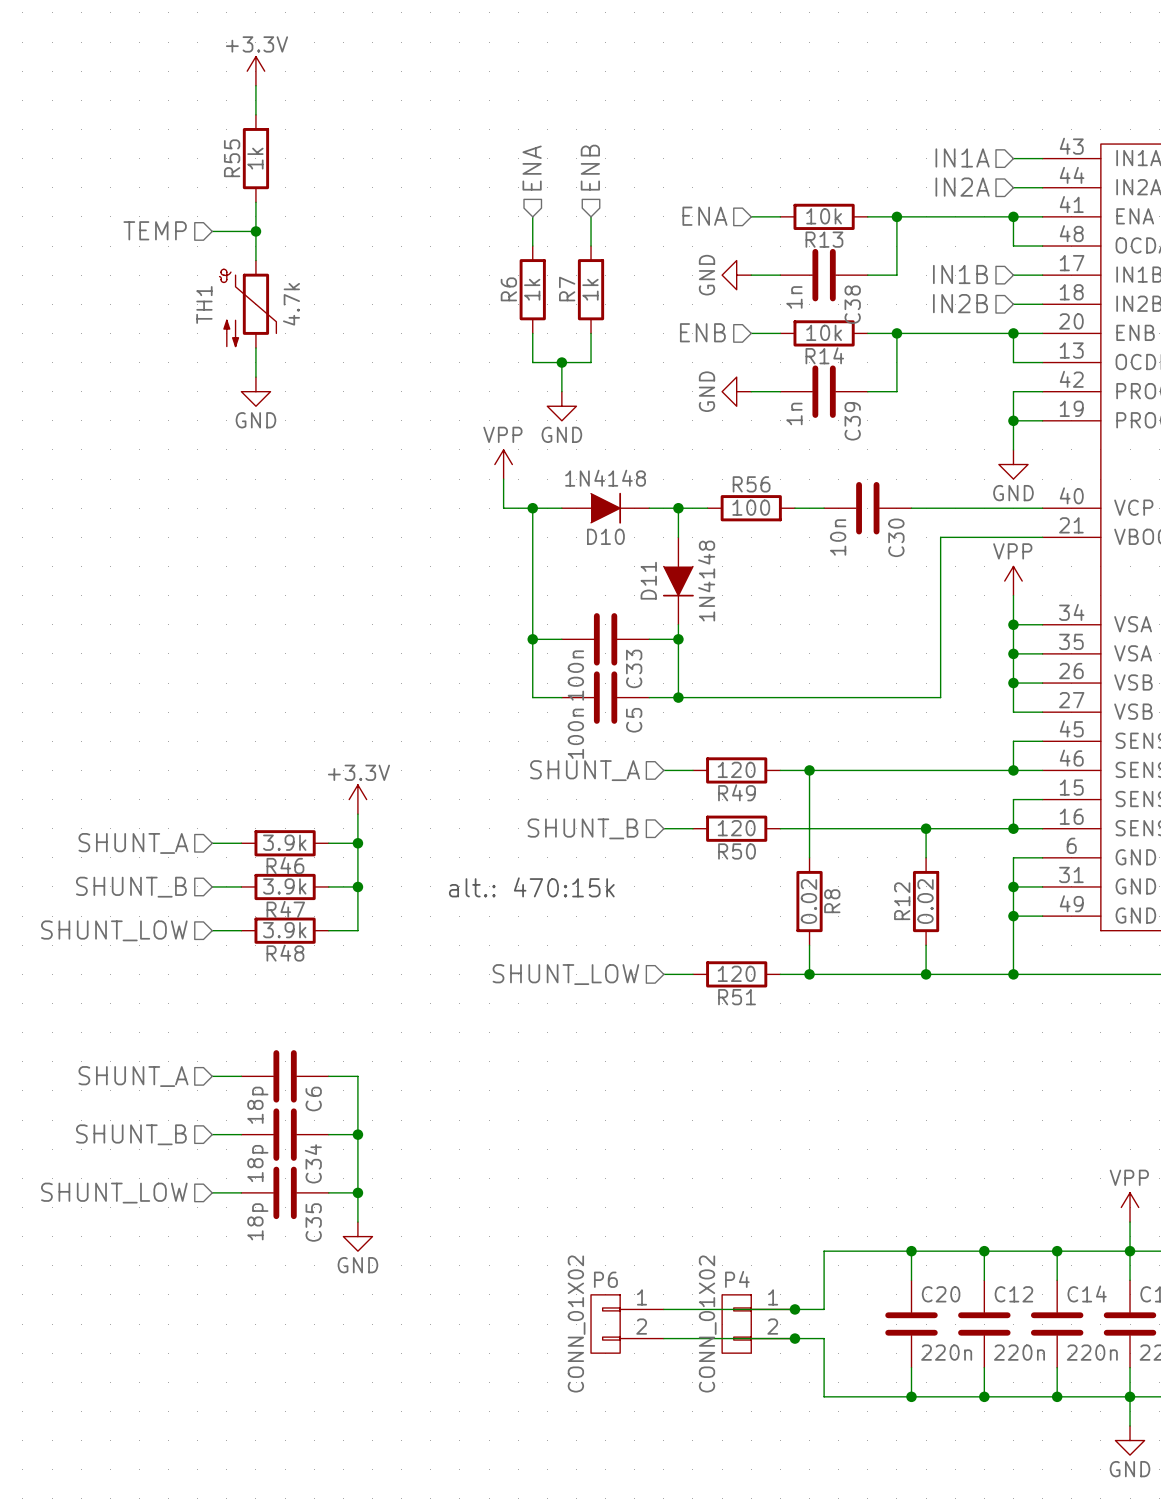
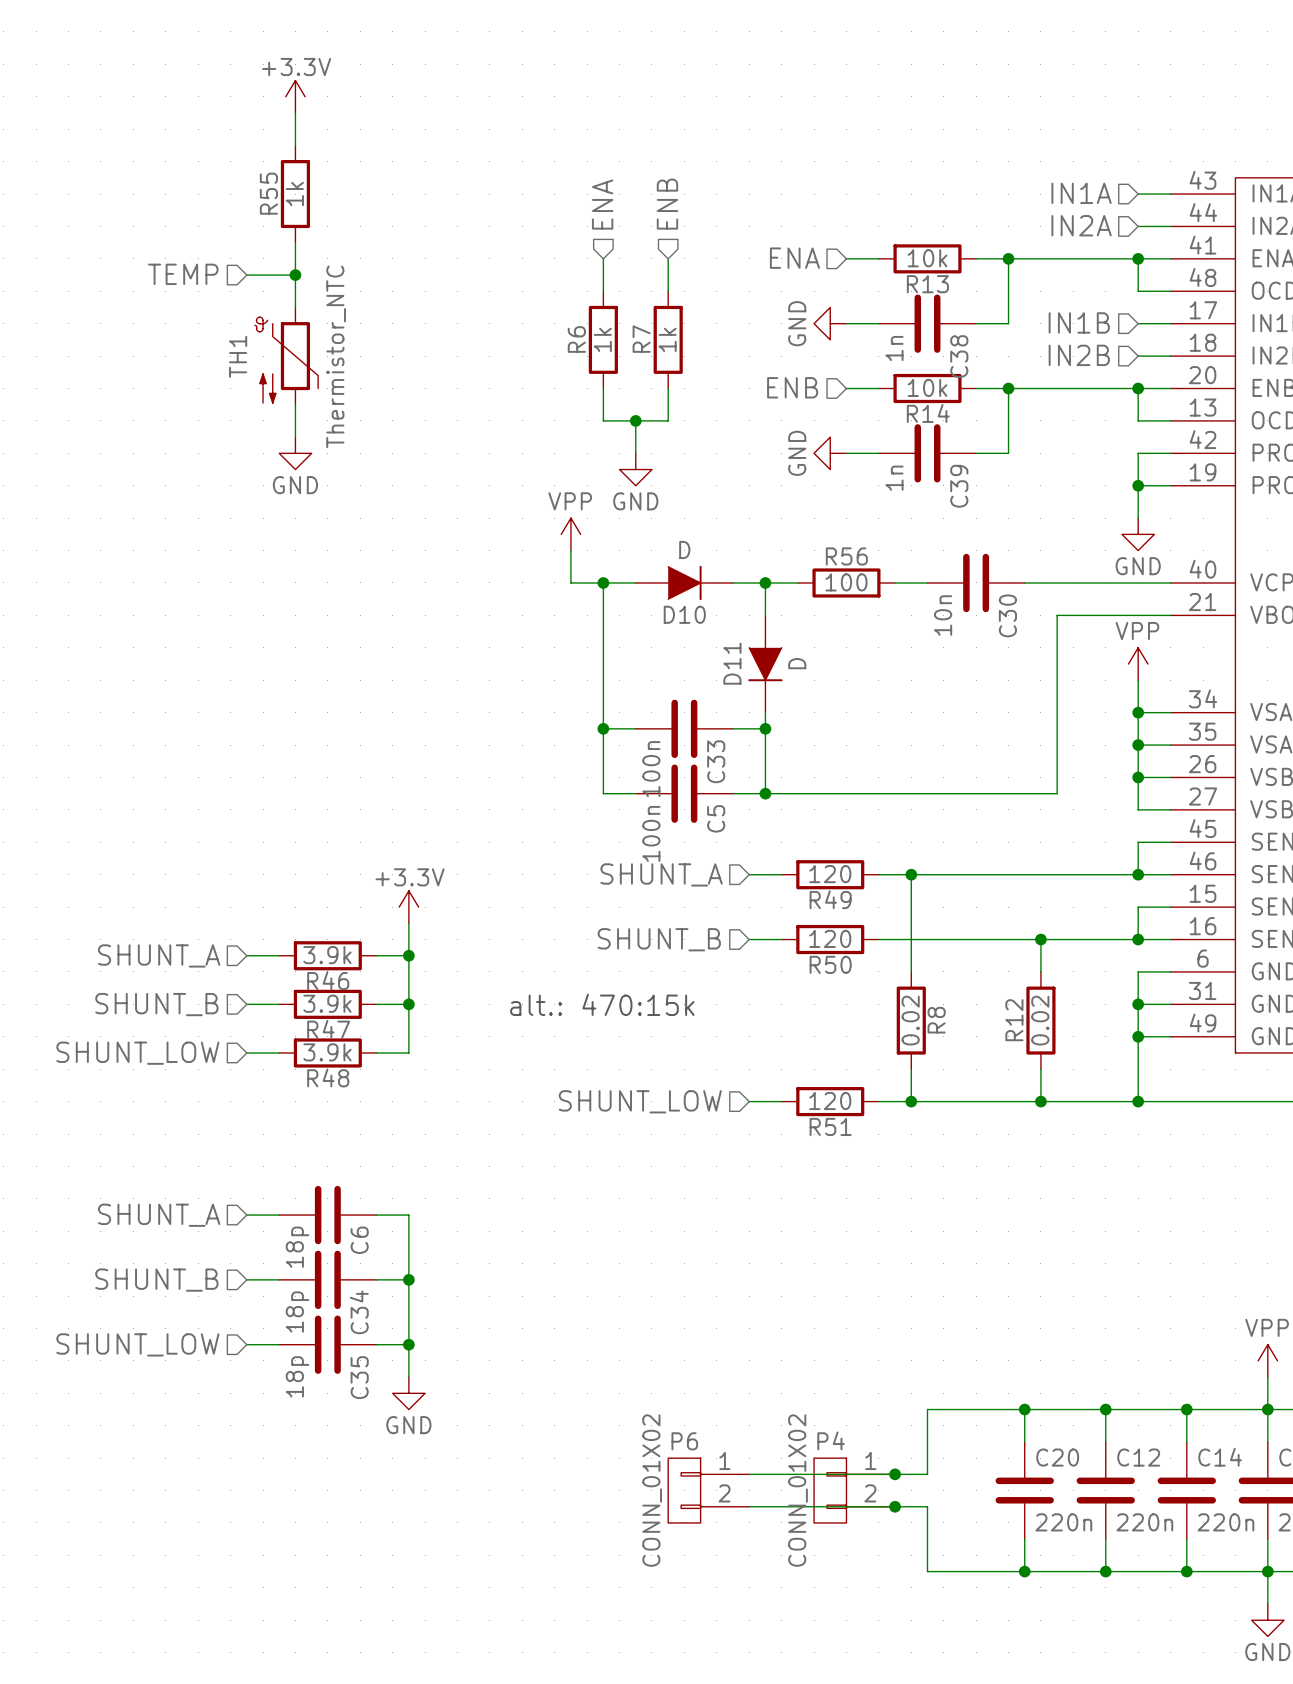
TH1 value: 4.7k (291, 304) -> Thermistor_NTC (336, 356)
D10 value: 1N4148 (605, 478) -> D (684, 549)
D11 value: 1N4148 (706, 581) -> D (797, 663)

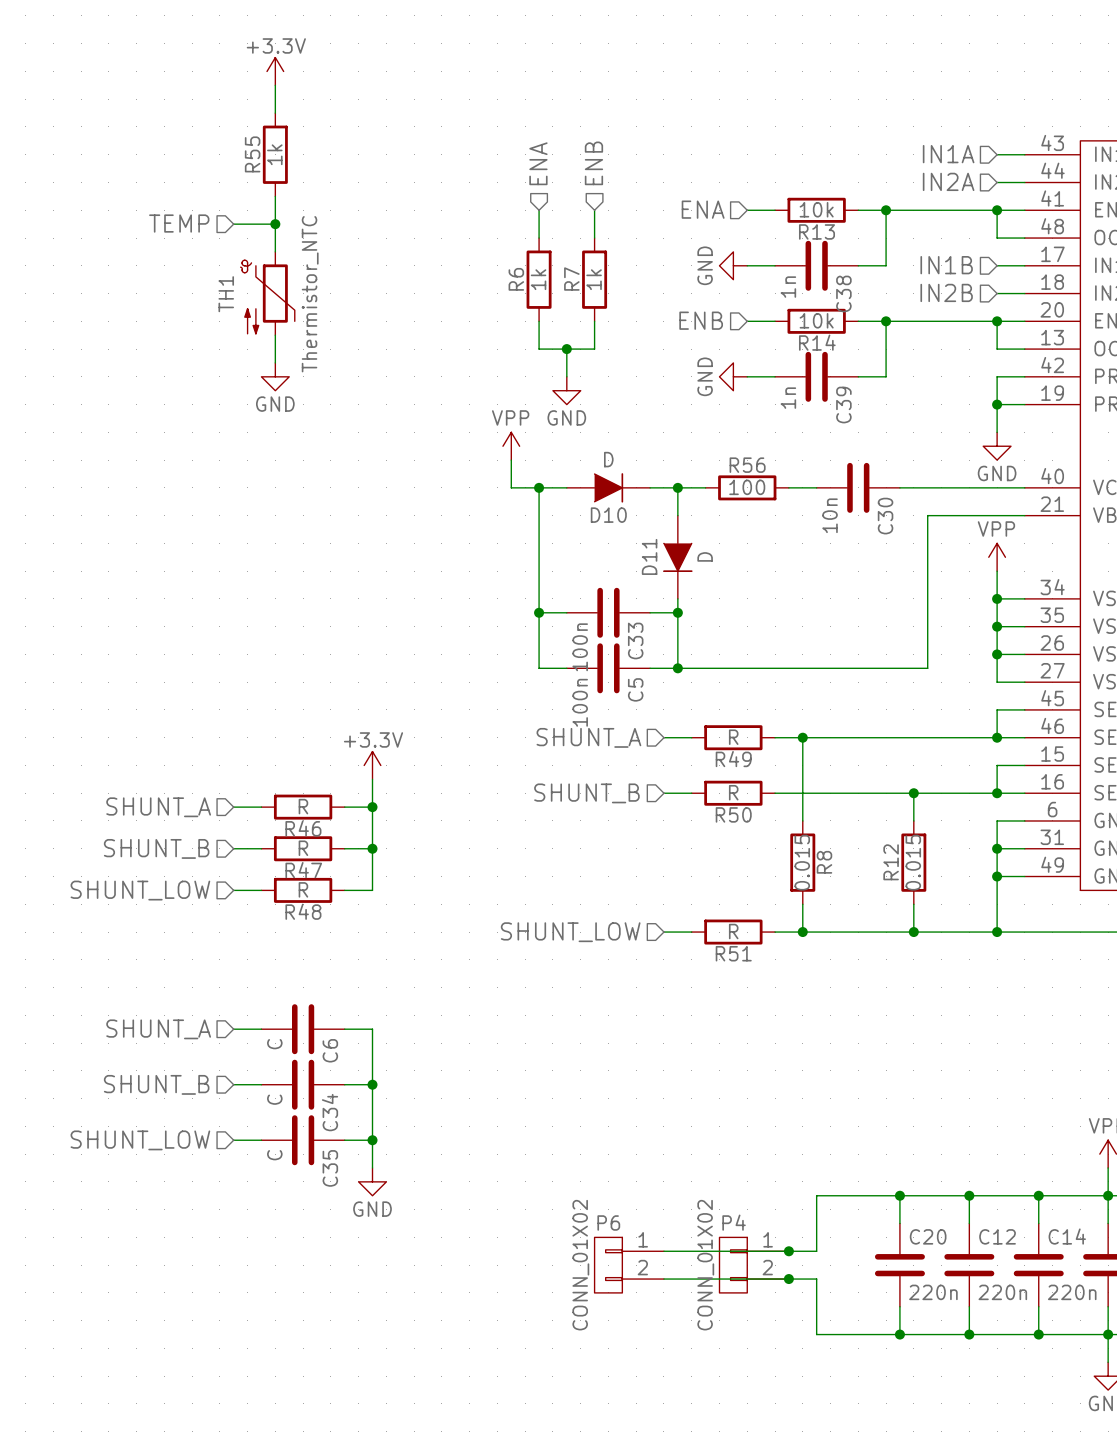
R49 value: 120 (830, 874) -> R (733, 737)
R50 value: 120 (830, 938) -> R (733, 792)
R46 value: 3.9k (327, 955) -> R (303, 806)
R47 value: 3.9k (327, 1003) -> R (303, 848)
text: alt.: 470:15k (602, 1004) -> none
R8 value: 0.02 (910, 1020) -> 0.015 (802, 862)
R12 value: 0.02 (1040, 1020) -> 0.015 (913, 862)
R48 value: 3.9k (327, 1052) -> R (303, 889)
R51 value: 120 (830, 1101) -> R (733, 931)
C6 value: 18p (297, 1247) -> C (274, 1044)
C34 value: 18p (297, 1312) -> C (274, 1099)
C35 value: 18p (297, 1376) -> C (274, 1155)

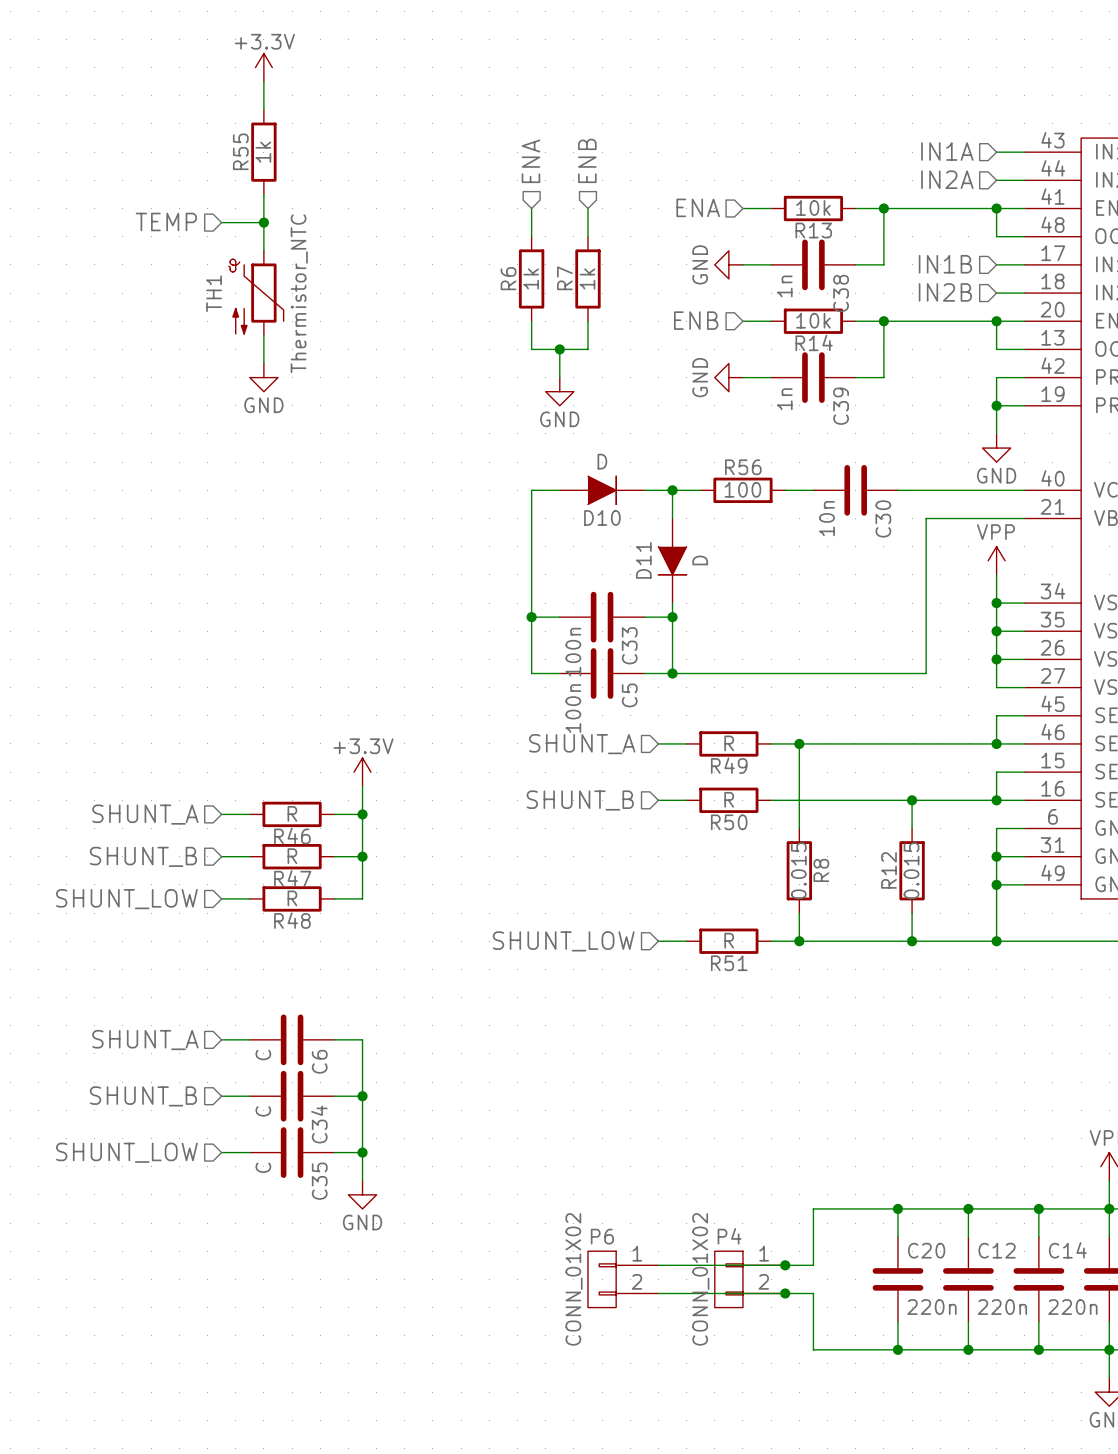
power symbol: VPP (511, 446) -> none
wire: (511, 460) (511, 487) (539, 487) -> none
junction: (539, 487) -> none

